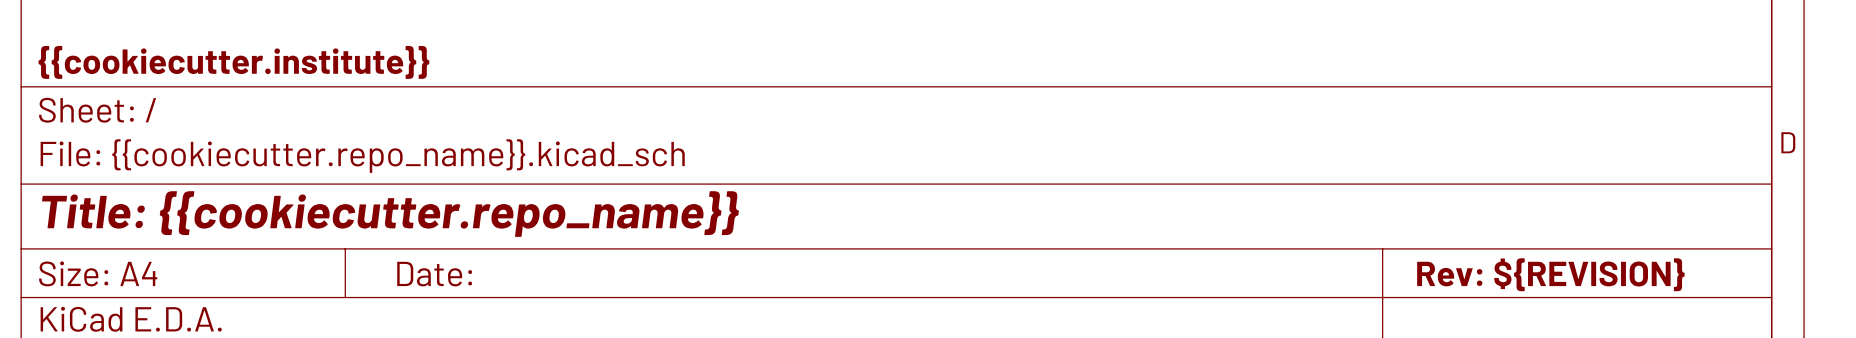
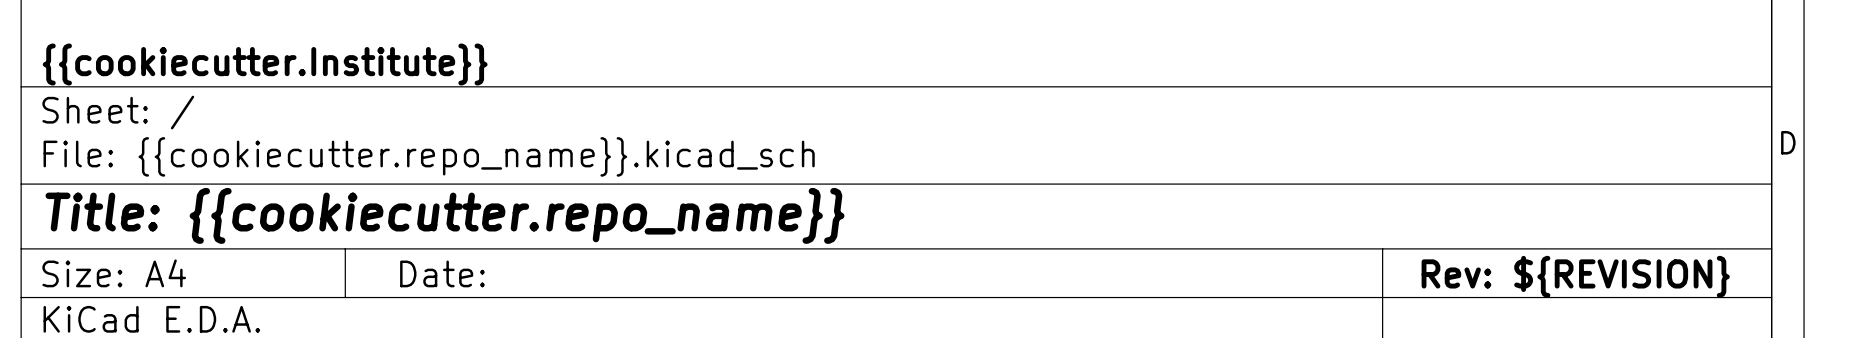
title block: {{cookiecutter.institute}} (233, 62) -> {{cookiecutter.Institute}} (265, 64)

